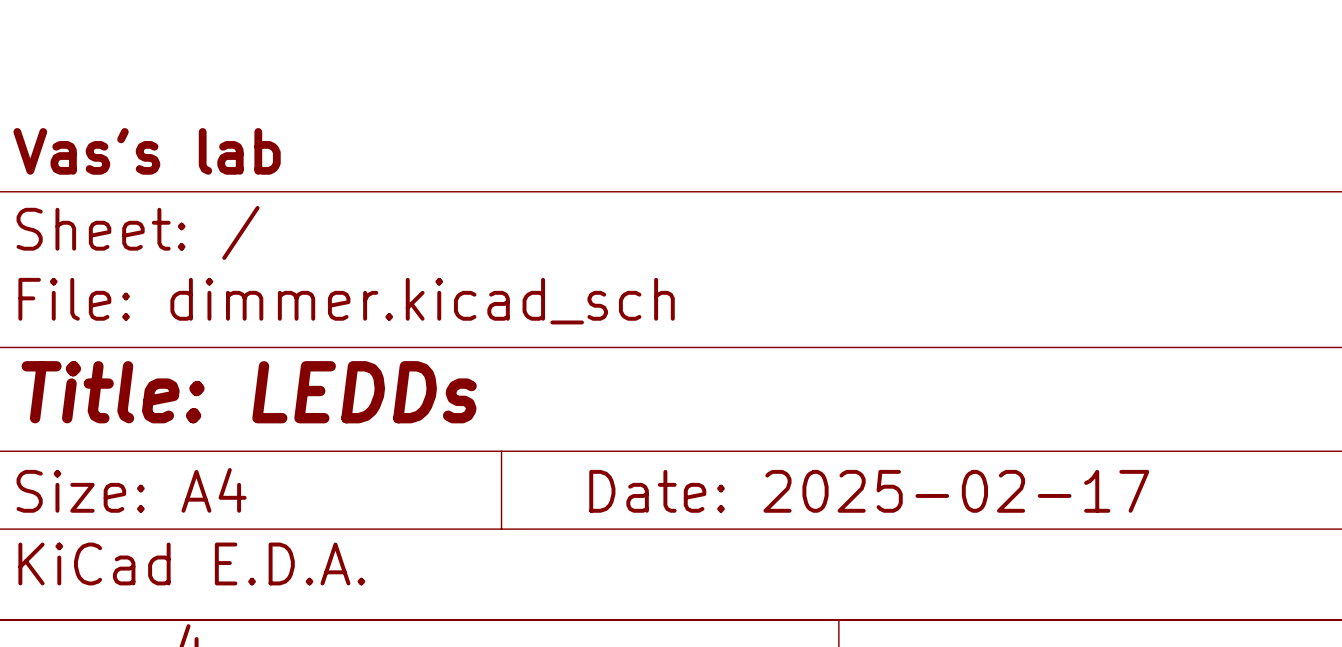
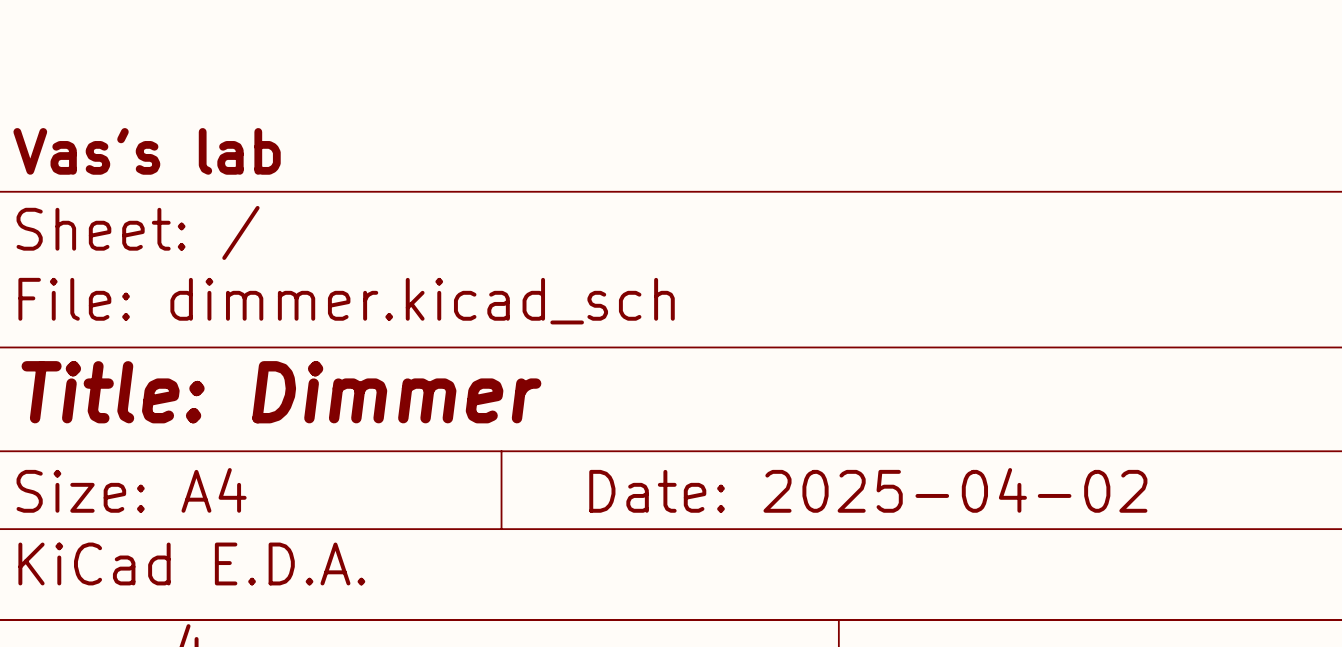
title block: Title: LEDDs (249, 392) -> Title: Dimmer (281, 392)
title block: Date: 2025-02-17 (869, 491) -> Date: 2025-04-02 (868, 490)

